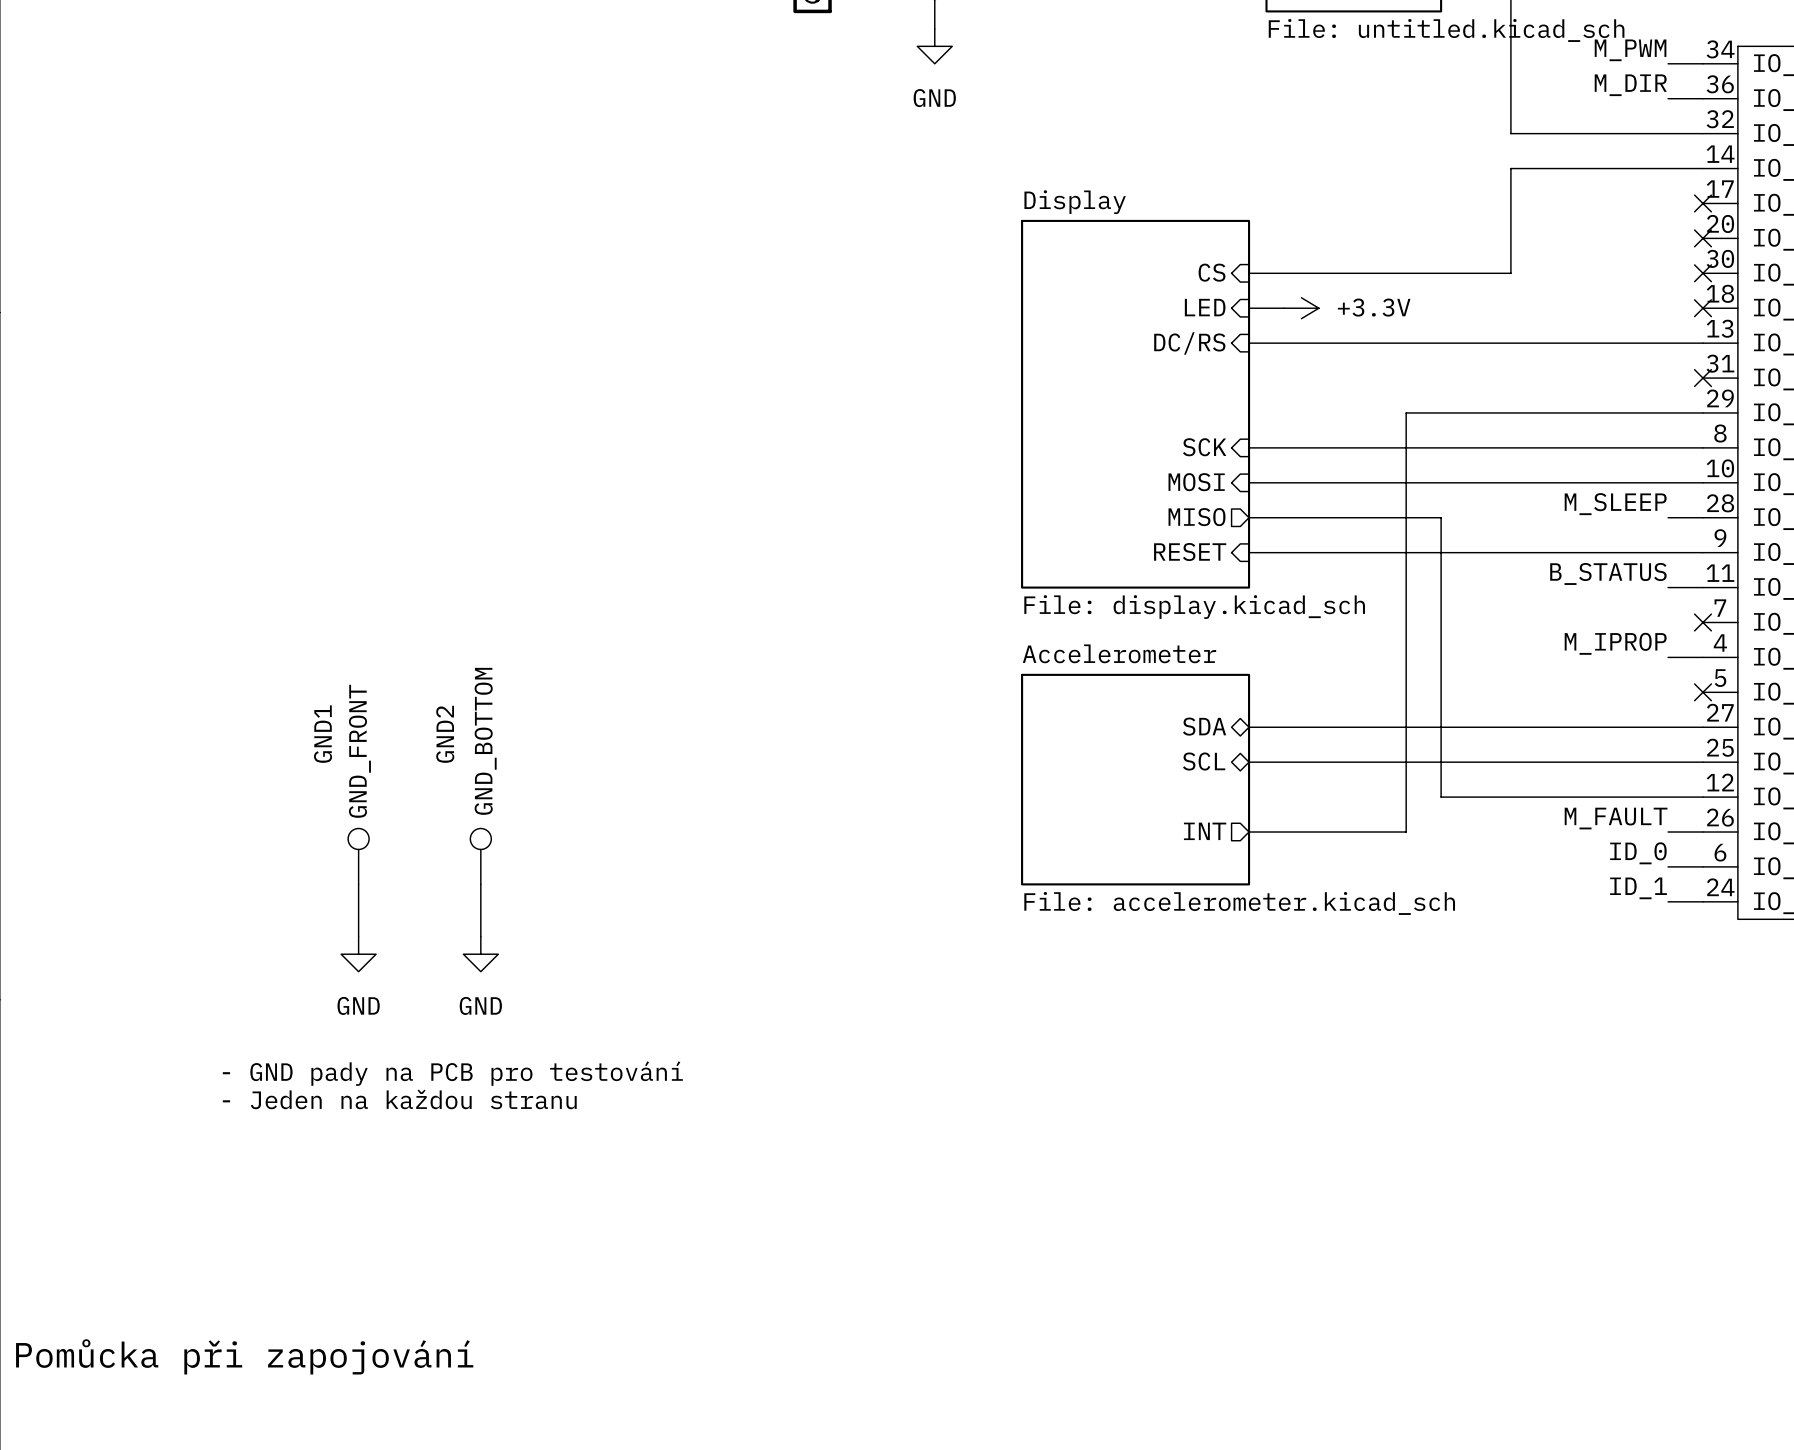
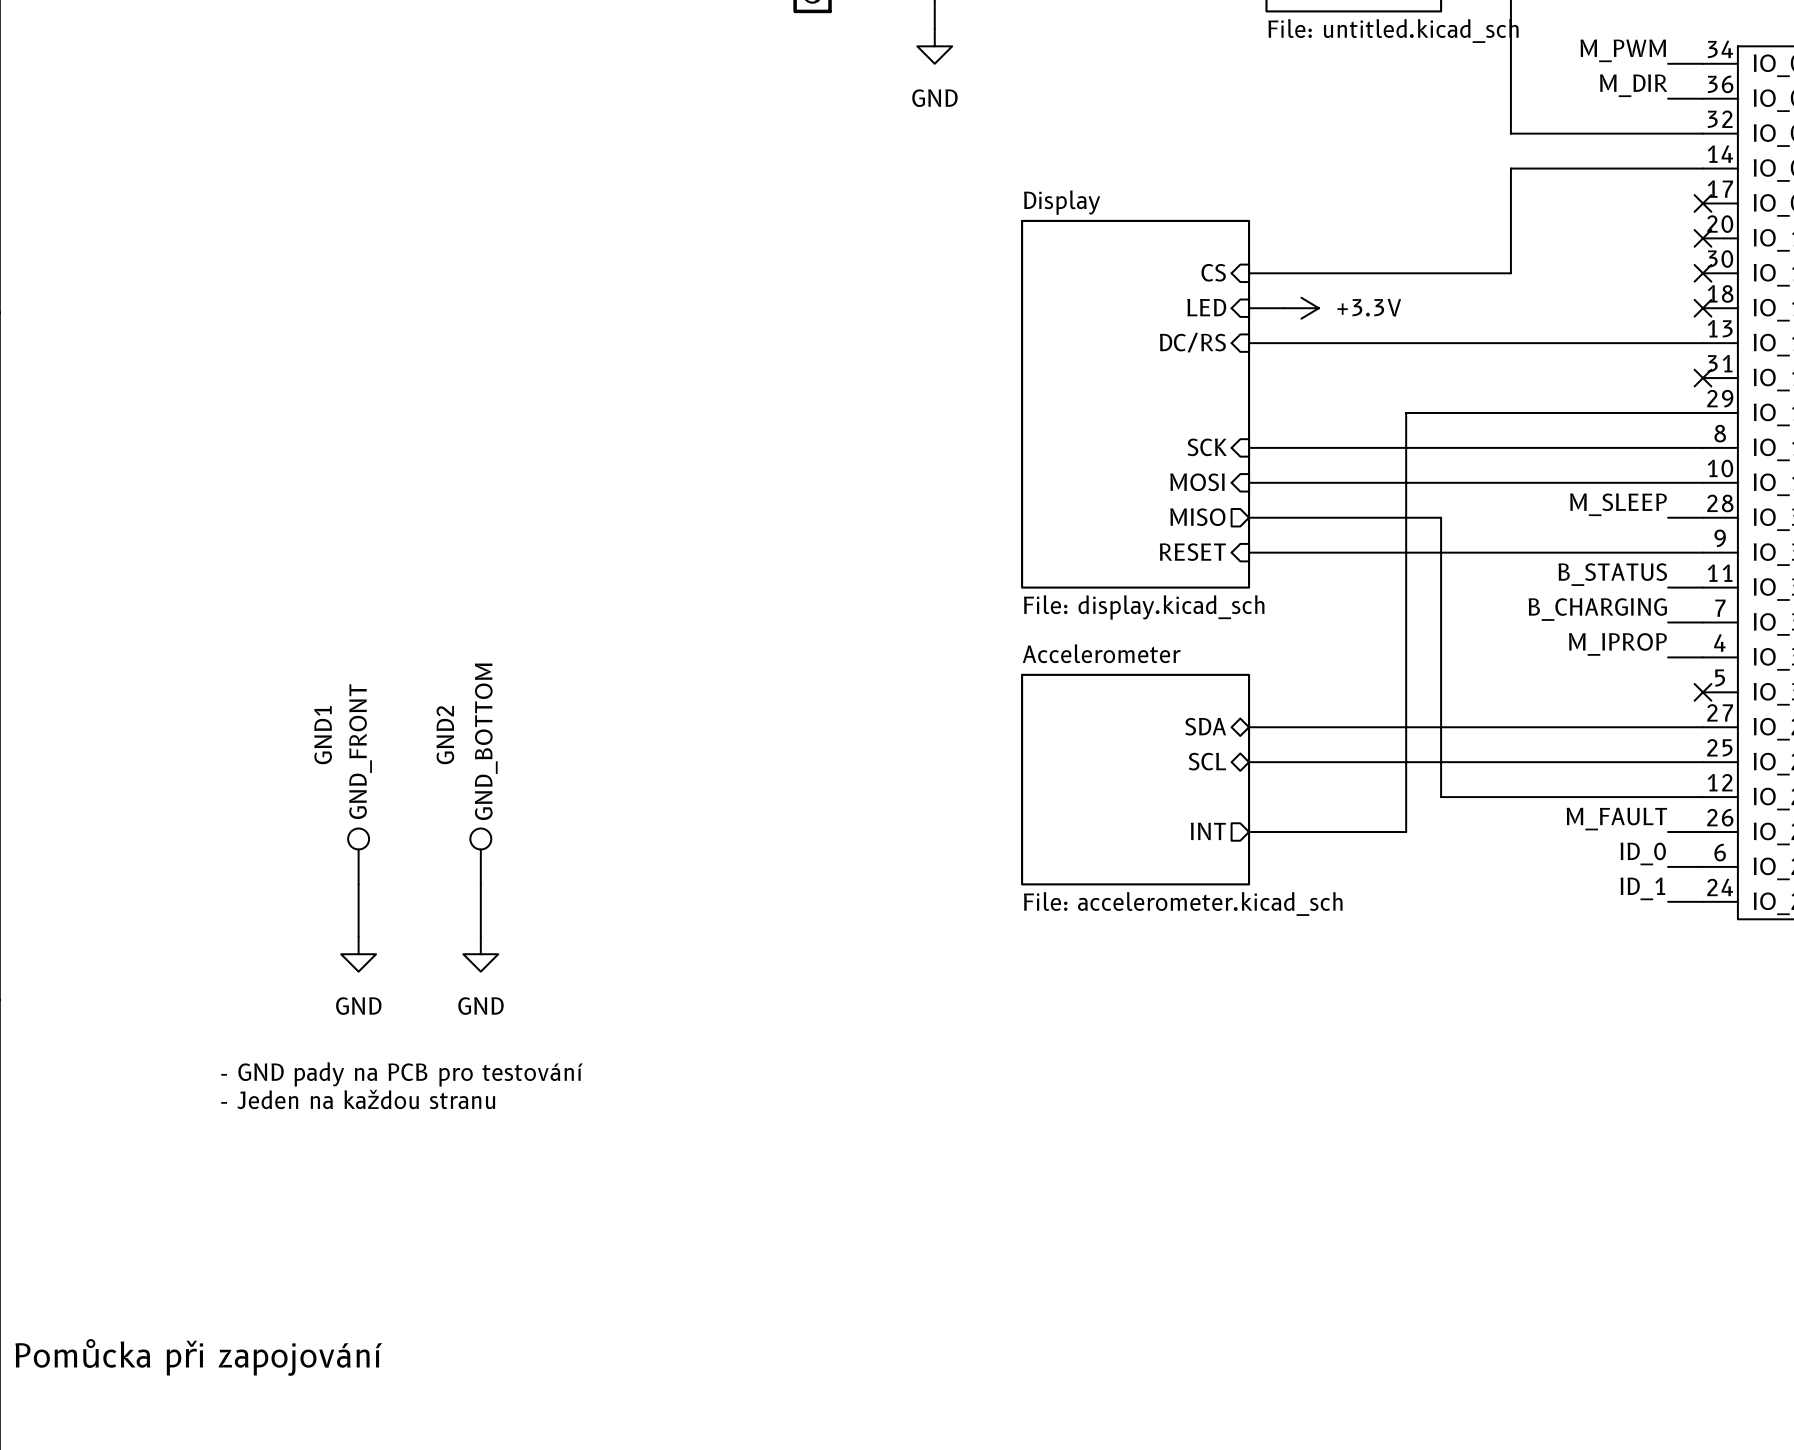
label: none -> B_CHARGING (1597, 609)
wire: none -> (1668, 622) (1702, 622)
no-connect mark: (1702, 622) -> none

